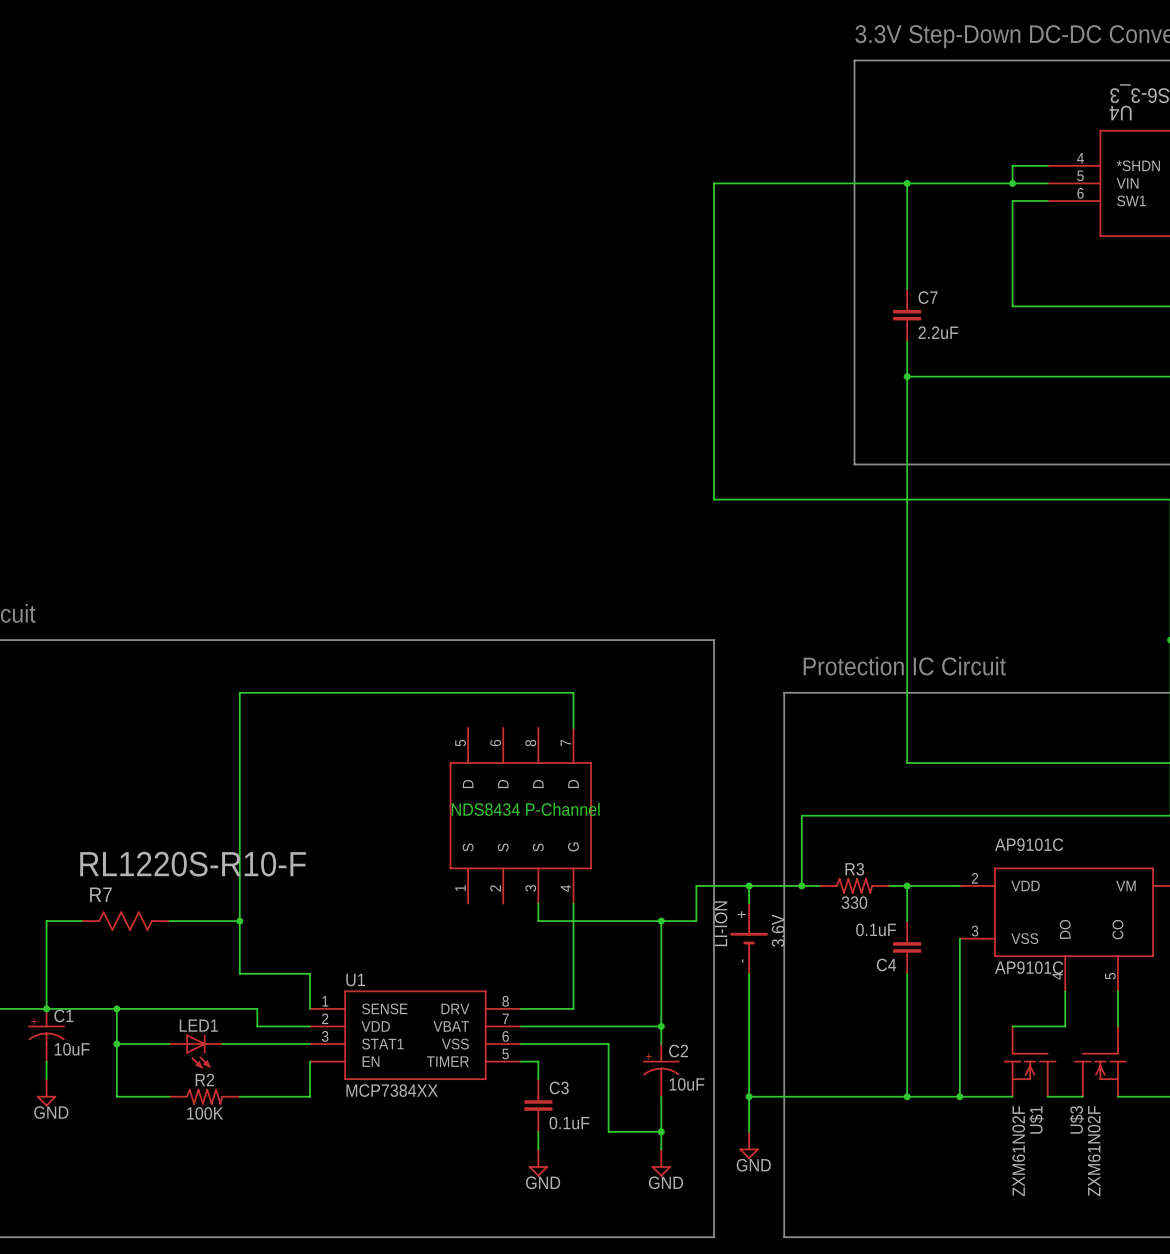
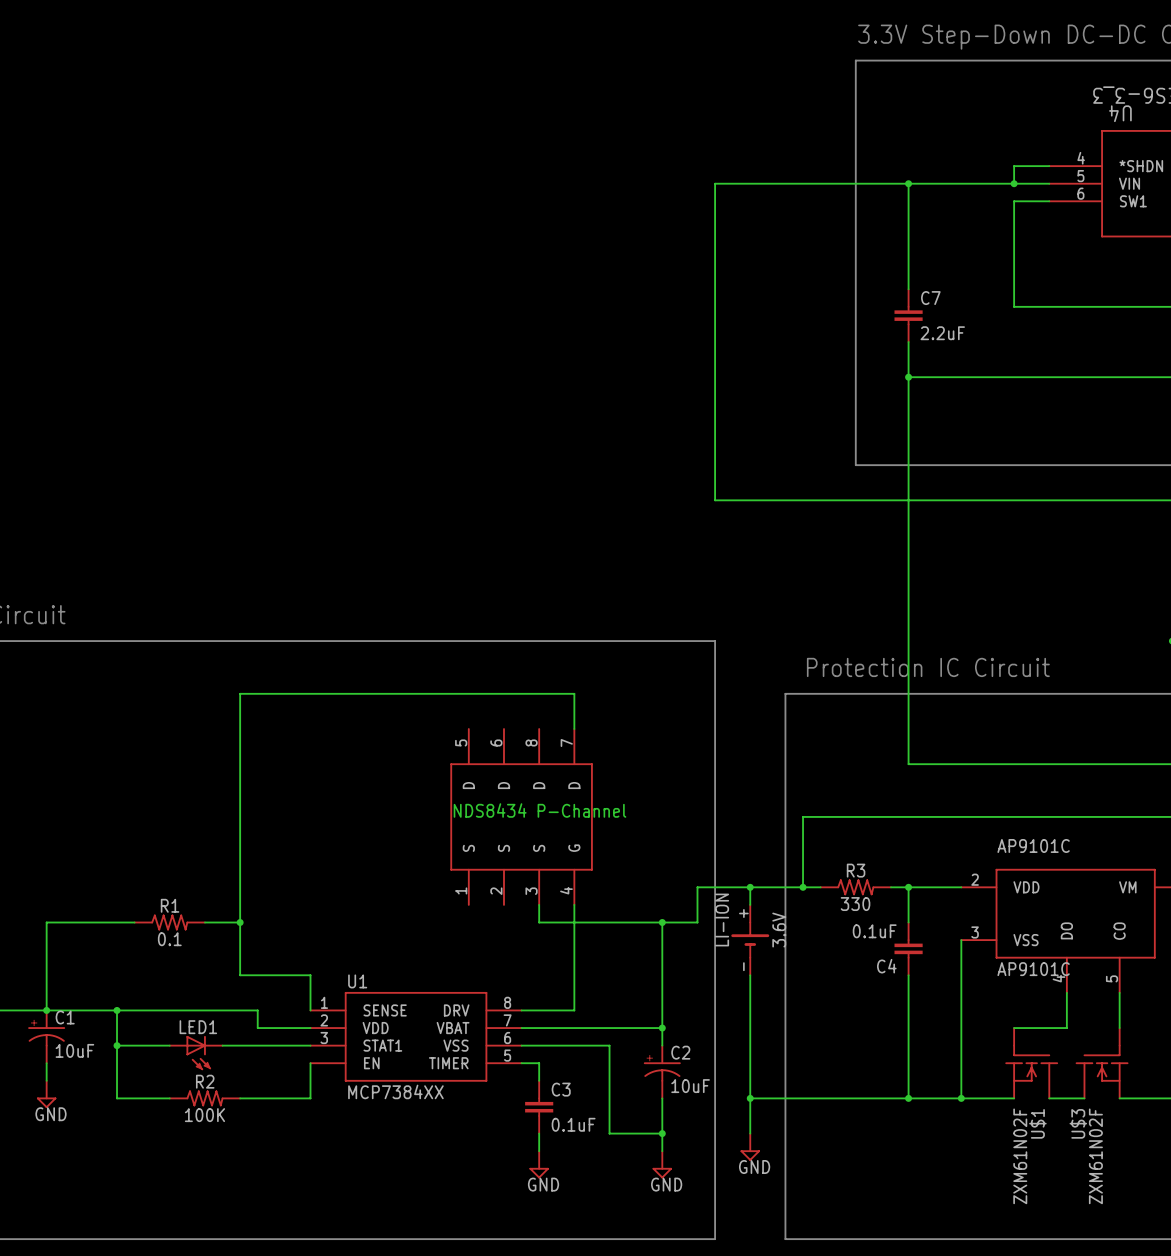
wire: none -> (81, 922) (134, 922)
R7: RL1220S-R10-F (125, 921) -> none
R1: none -> 0.1 (169, 922)

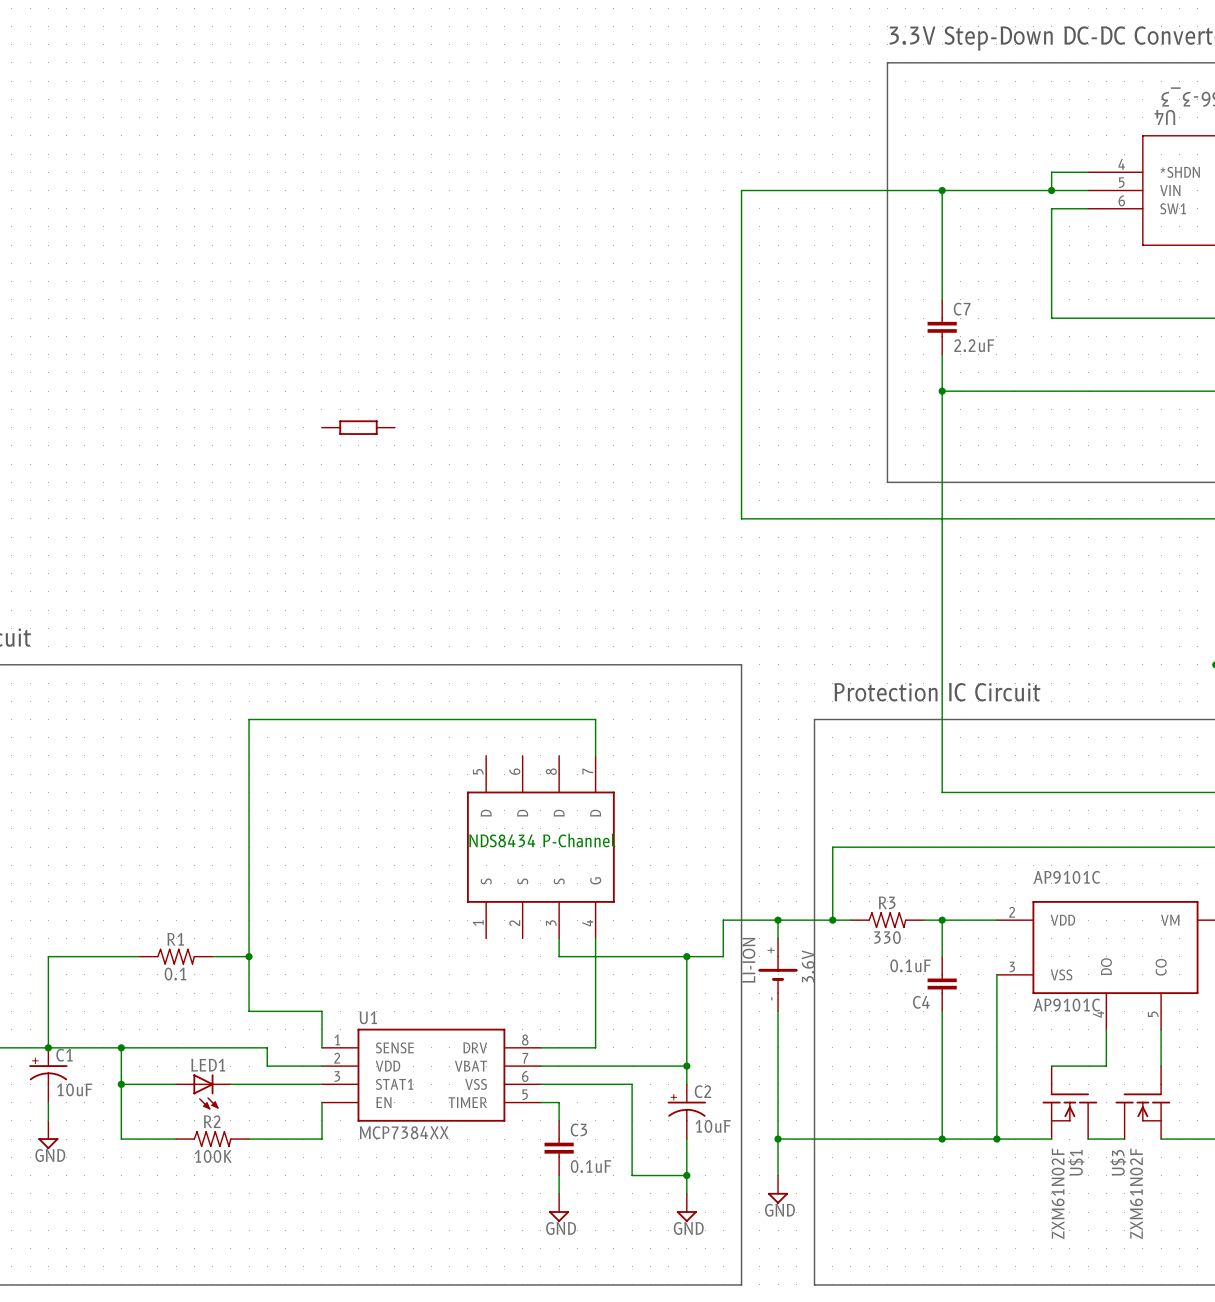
part: none -> (358, 427)

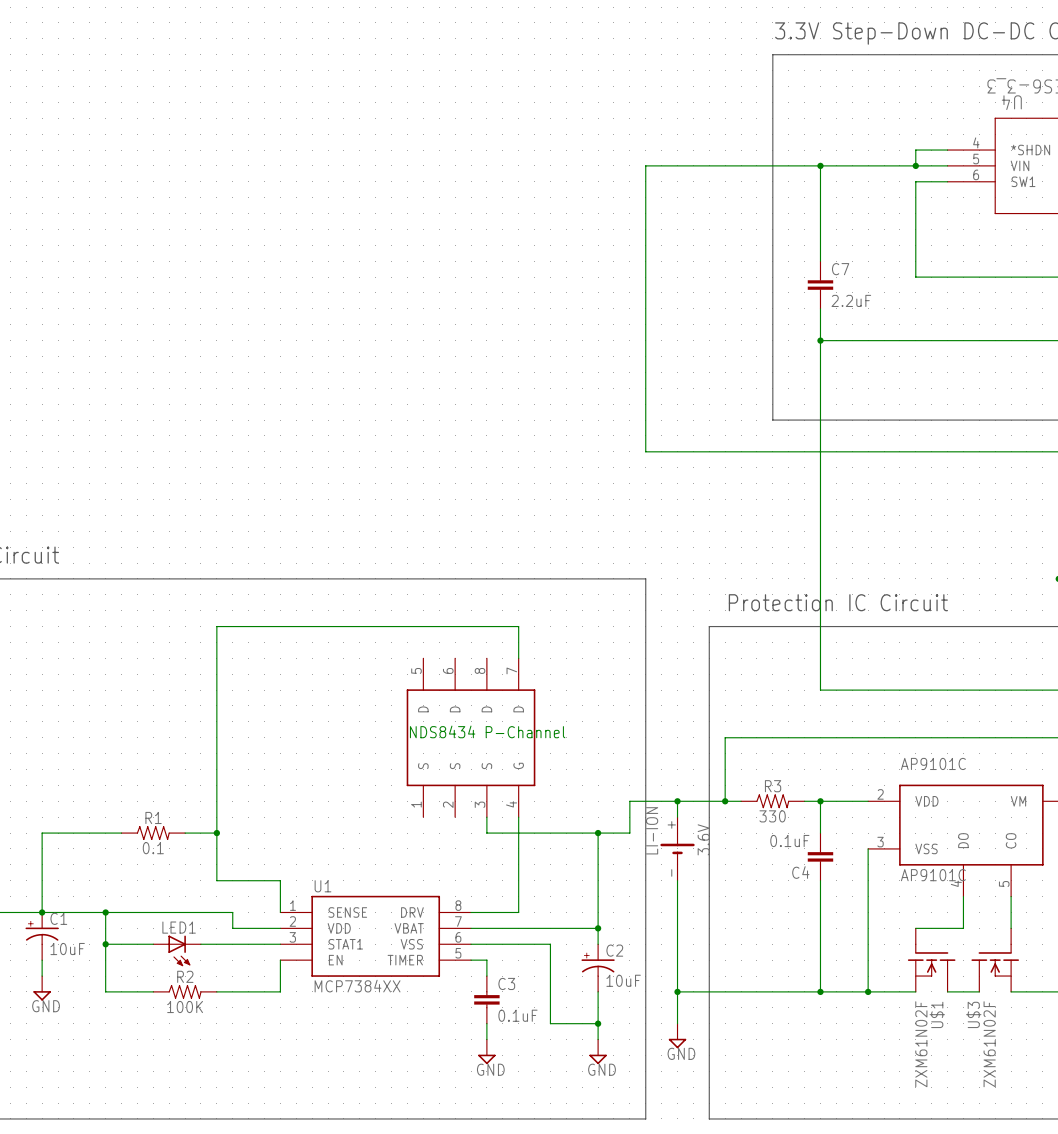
part: (358, 427) -> none

